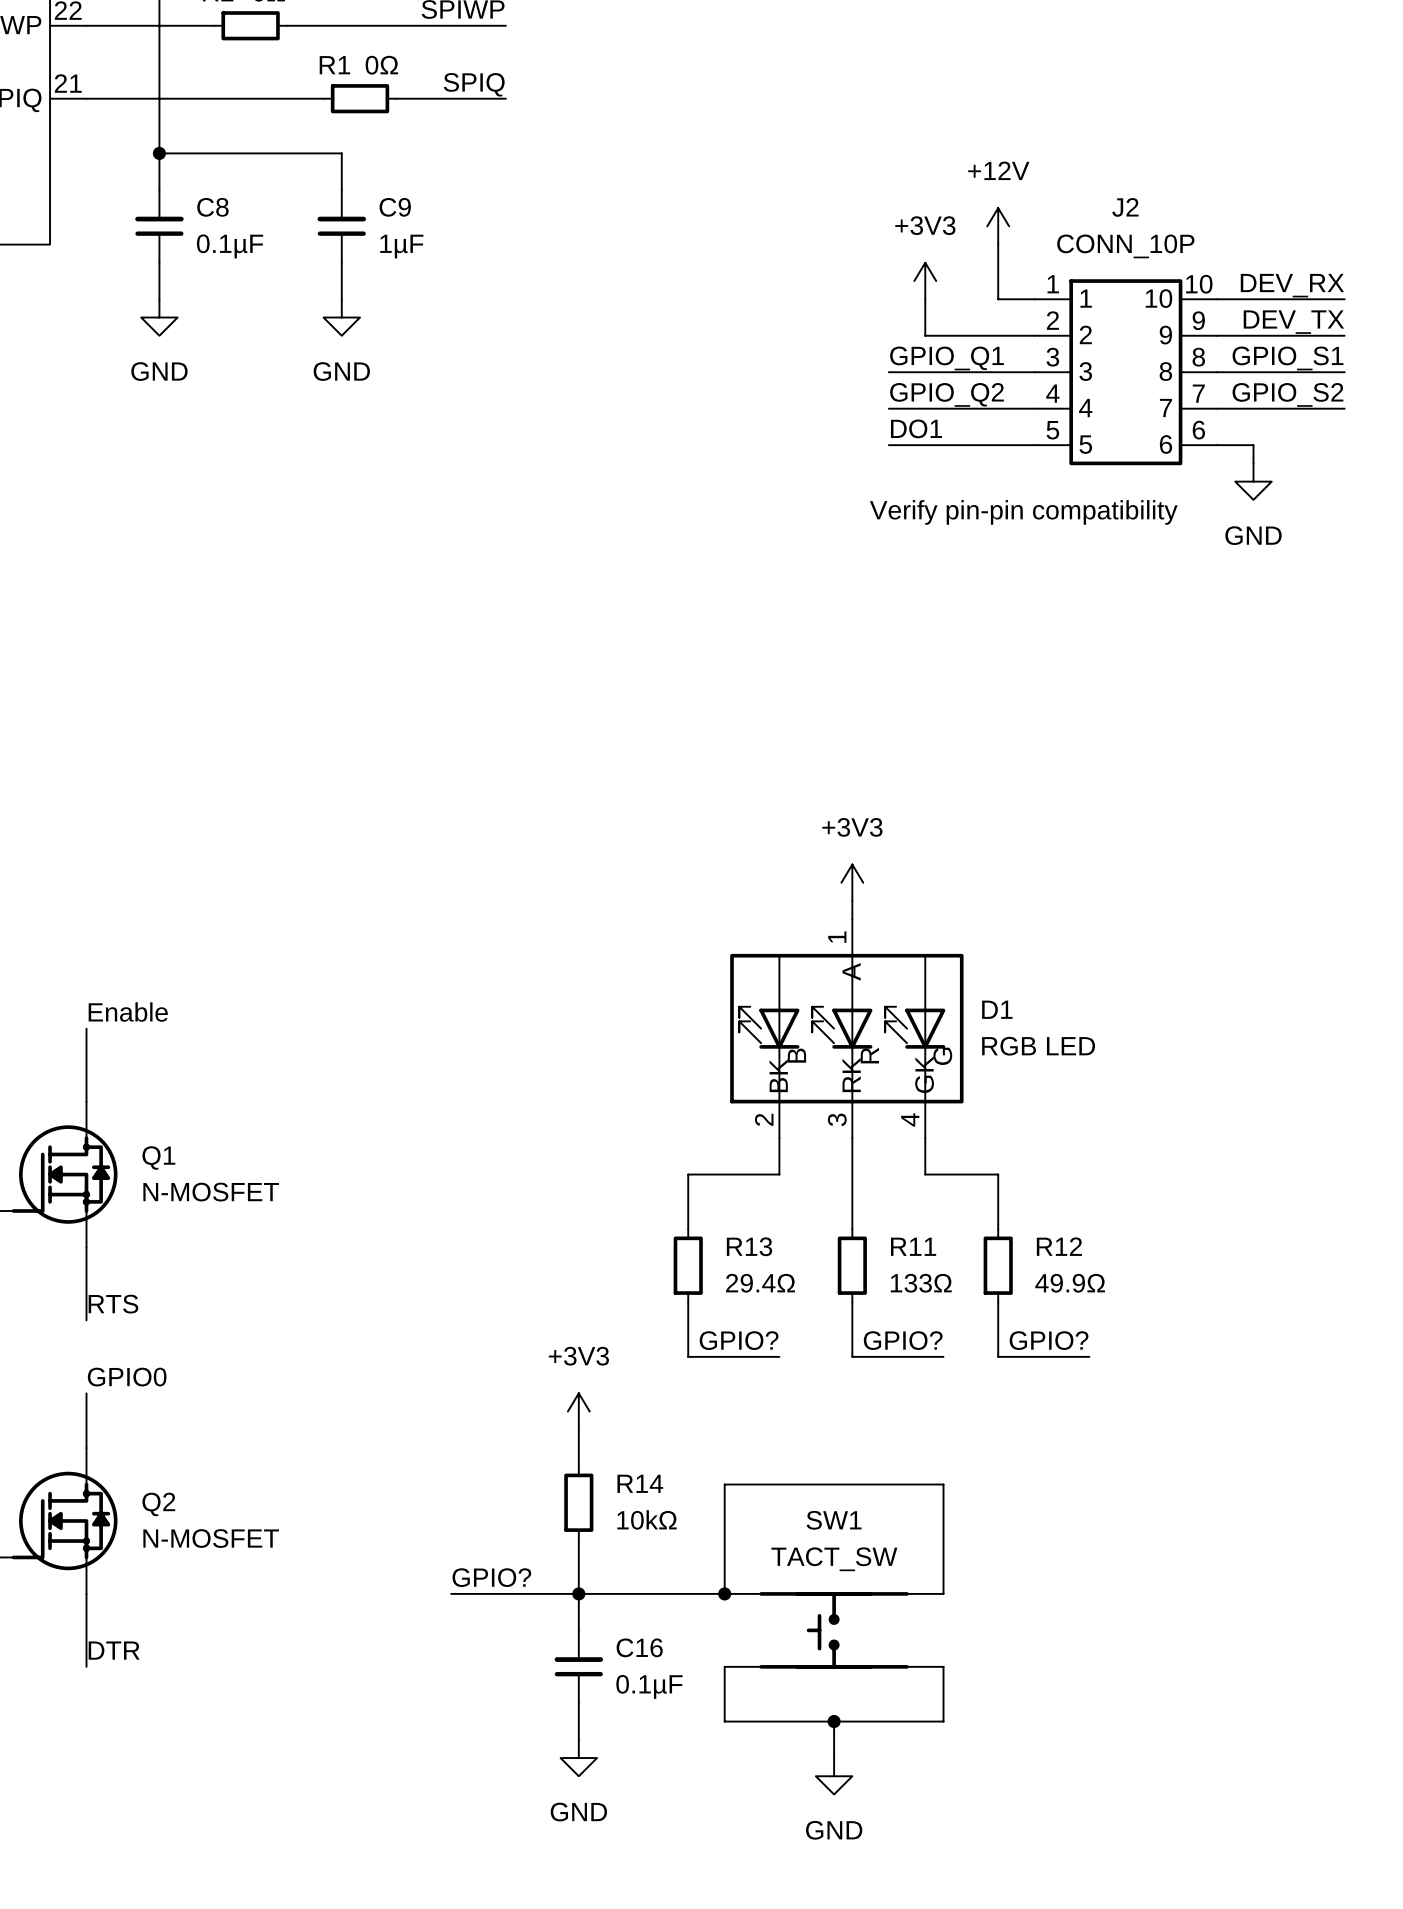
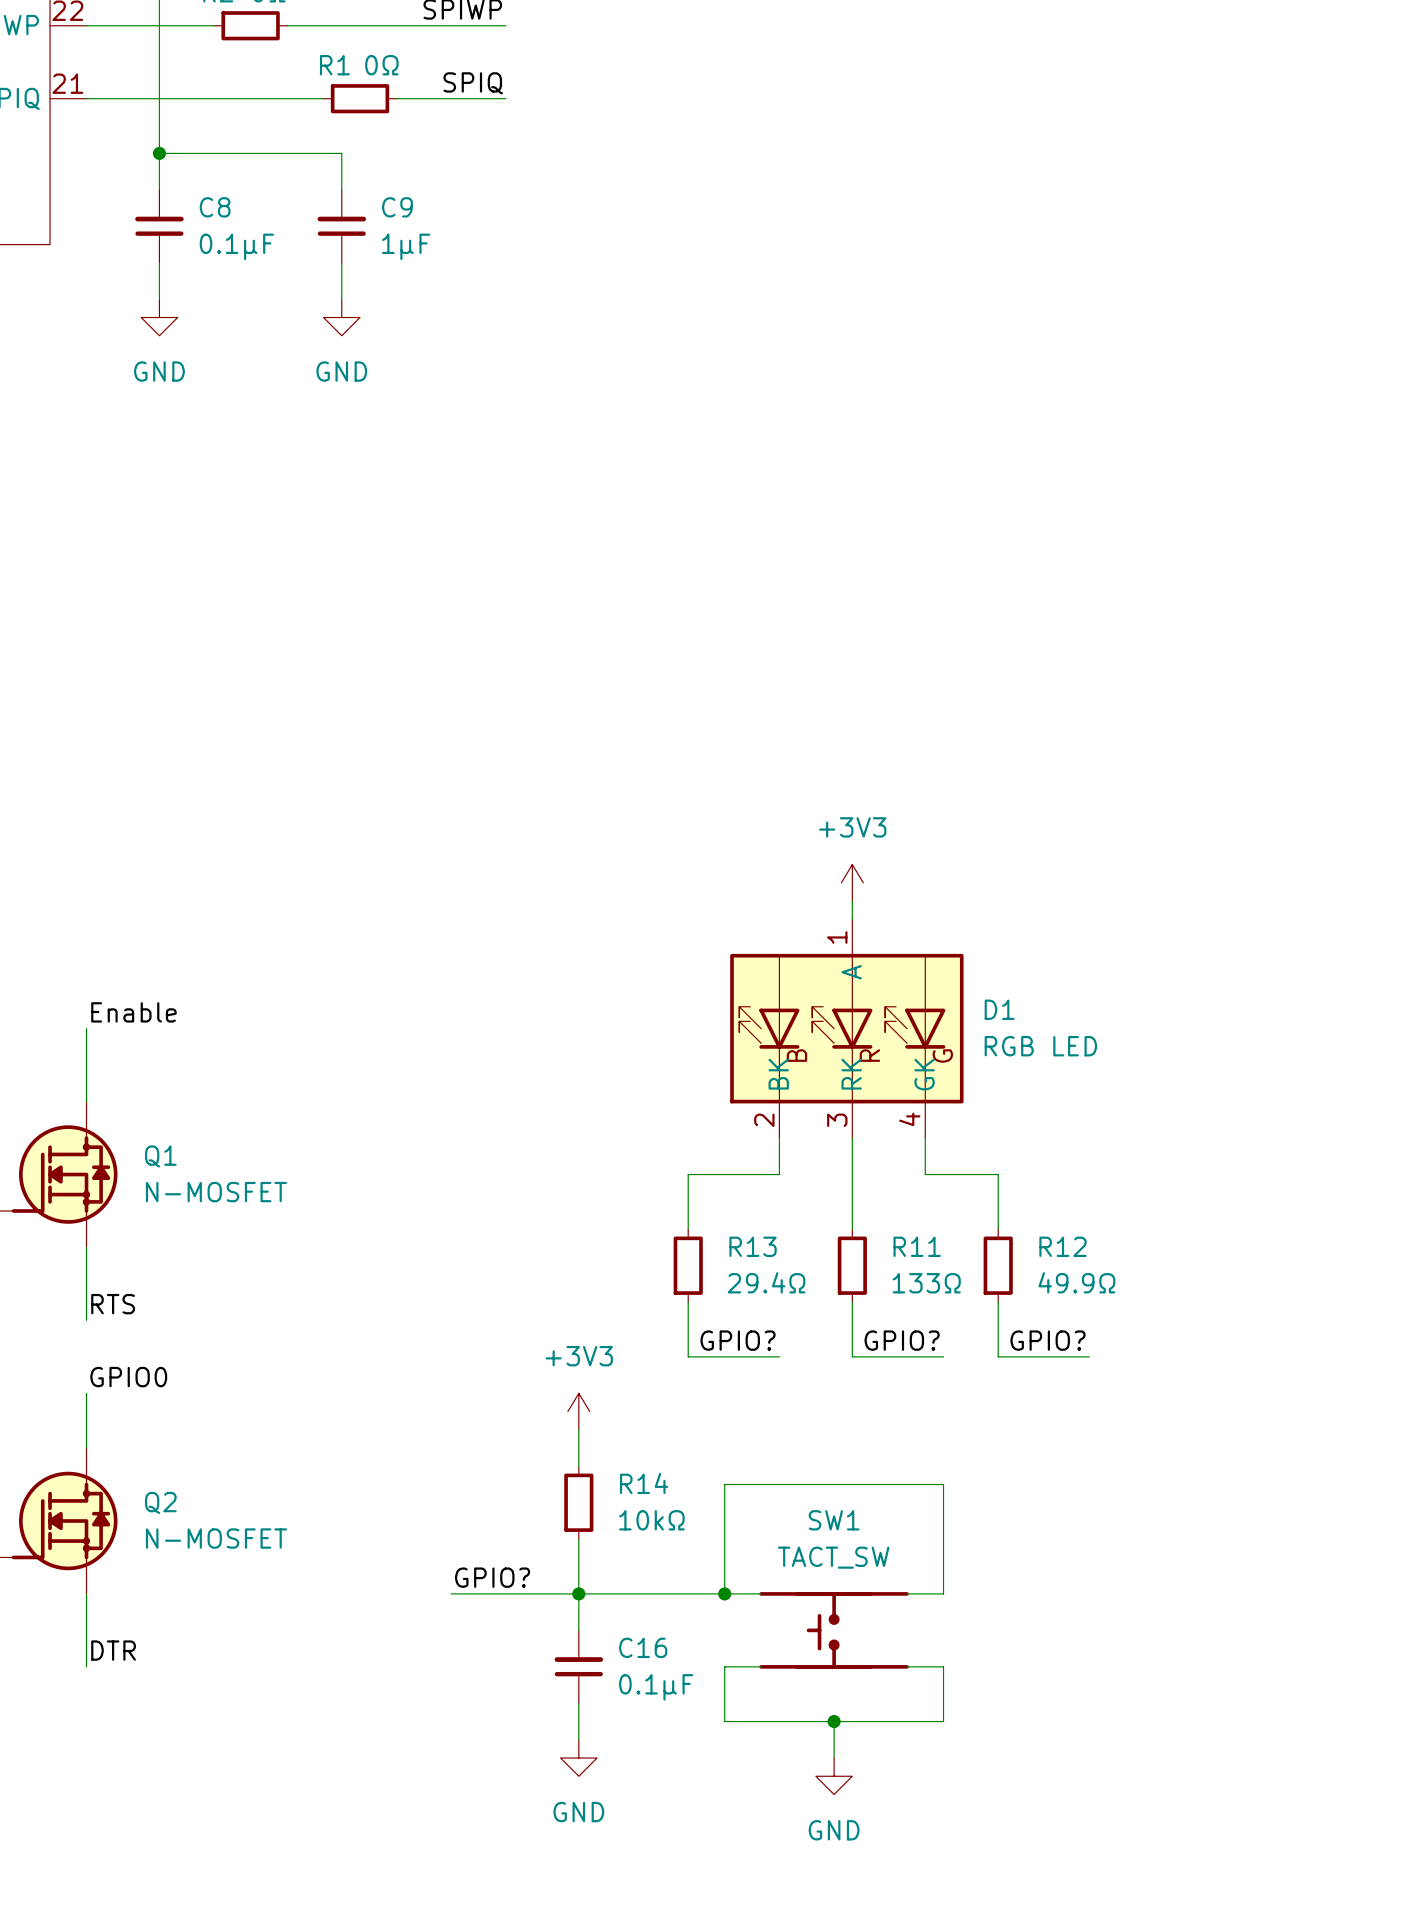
power symbol: +12V (998, 226) -> none
wire: (998, 244) (998, 299) (1034, 299) -> none
power symbol: +3V3 (925, 281) -> none
label: DEV_RX (1292, 285) -> none
wire: (925, 299) (925, 335) (1034, 335) -> none
wire: (1217, 299) (1344, 299) -> none
label: DEV_TX (1293, 322) -> none
wire: (1217, 335) (1344, 335) -> none
label: GPIO_Q1 (947, 358) -> none
label: GPIO_S1 (1287, 358) -> none
wire: (888, 372) (1034, 372) -> none
J2: (1125, 372) -> none
wire: (1217, 372) (1344, 372) -> none
label: GPIO_Q2 (946, 394) -> none
label: GPIO_S2 (1287, 394) -> none
wire: (888, 408) (1034, 408) -> none
wire: (1217, 408) (1344, 408) -> none
label: DO1 (916, 428) -> none
wire: (888, 445) (1034, 445) -> none
wire: (1217, 445) (1253, 445) (1253, 463) -> none
power symbol: GND (1253, 481) -> none
text: Verify pin-pin compatibility (1023, 512) -> none

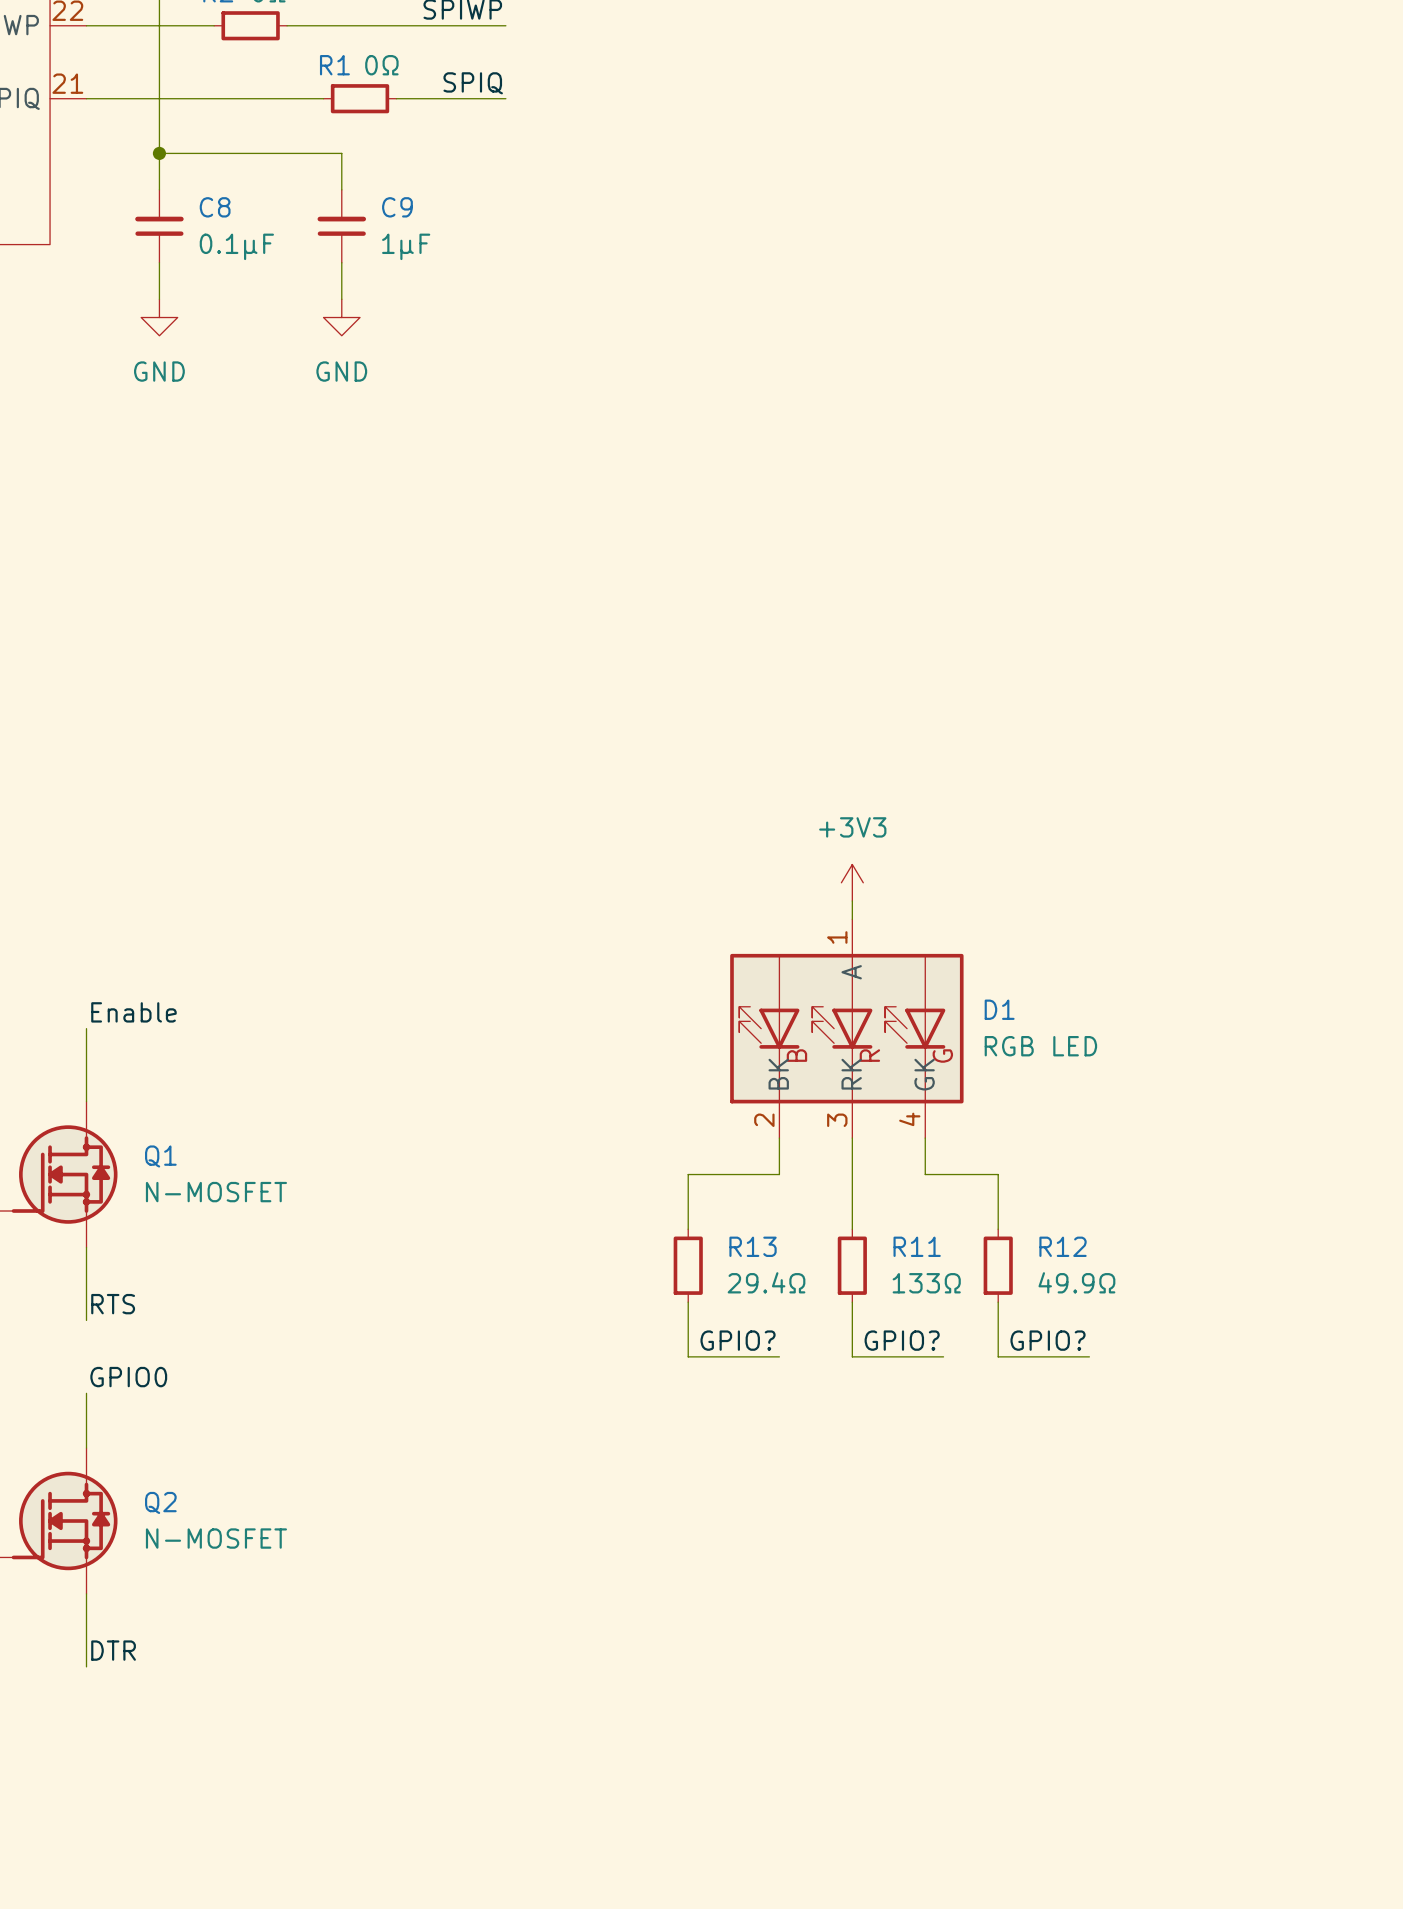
power symbol: +3V3 (578, 1411) -> none
wire: (578, 1429) (578, 1466) -> none
R14: (578, 1502) -> none
wire: (578, 1539) (578, 1630) -> none
label: GPIO? (492, 1577) -> none
wire: (451, 1593) (761, 1593) -> none
junction: (578, 1593) -> none
wire: (724, 1593) (724, 1484) (943, 1484) (943, 1593) (907, 1593) -> none
junction: (724, 1593) -> none
SW1: (834, 1630) -> none
C16: (578, 1666) -> none
wire: (761, 1666) (724, 1666) (724, 1721) (943, 1721) (943, 1666) (907, 1666) -> none
wire: (578, 1703) (578, 1739) -> none
wire: (834, 1721) (834, 1758) -> none
junction: (834, 1721) -> none
power symbol: GND (578, 1758) -> none
power symbol: GND (834, 1776) -> none

